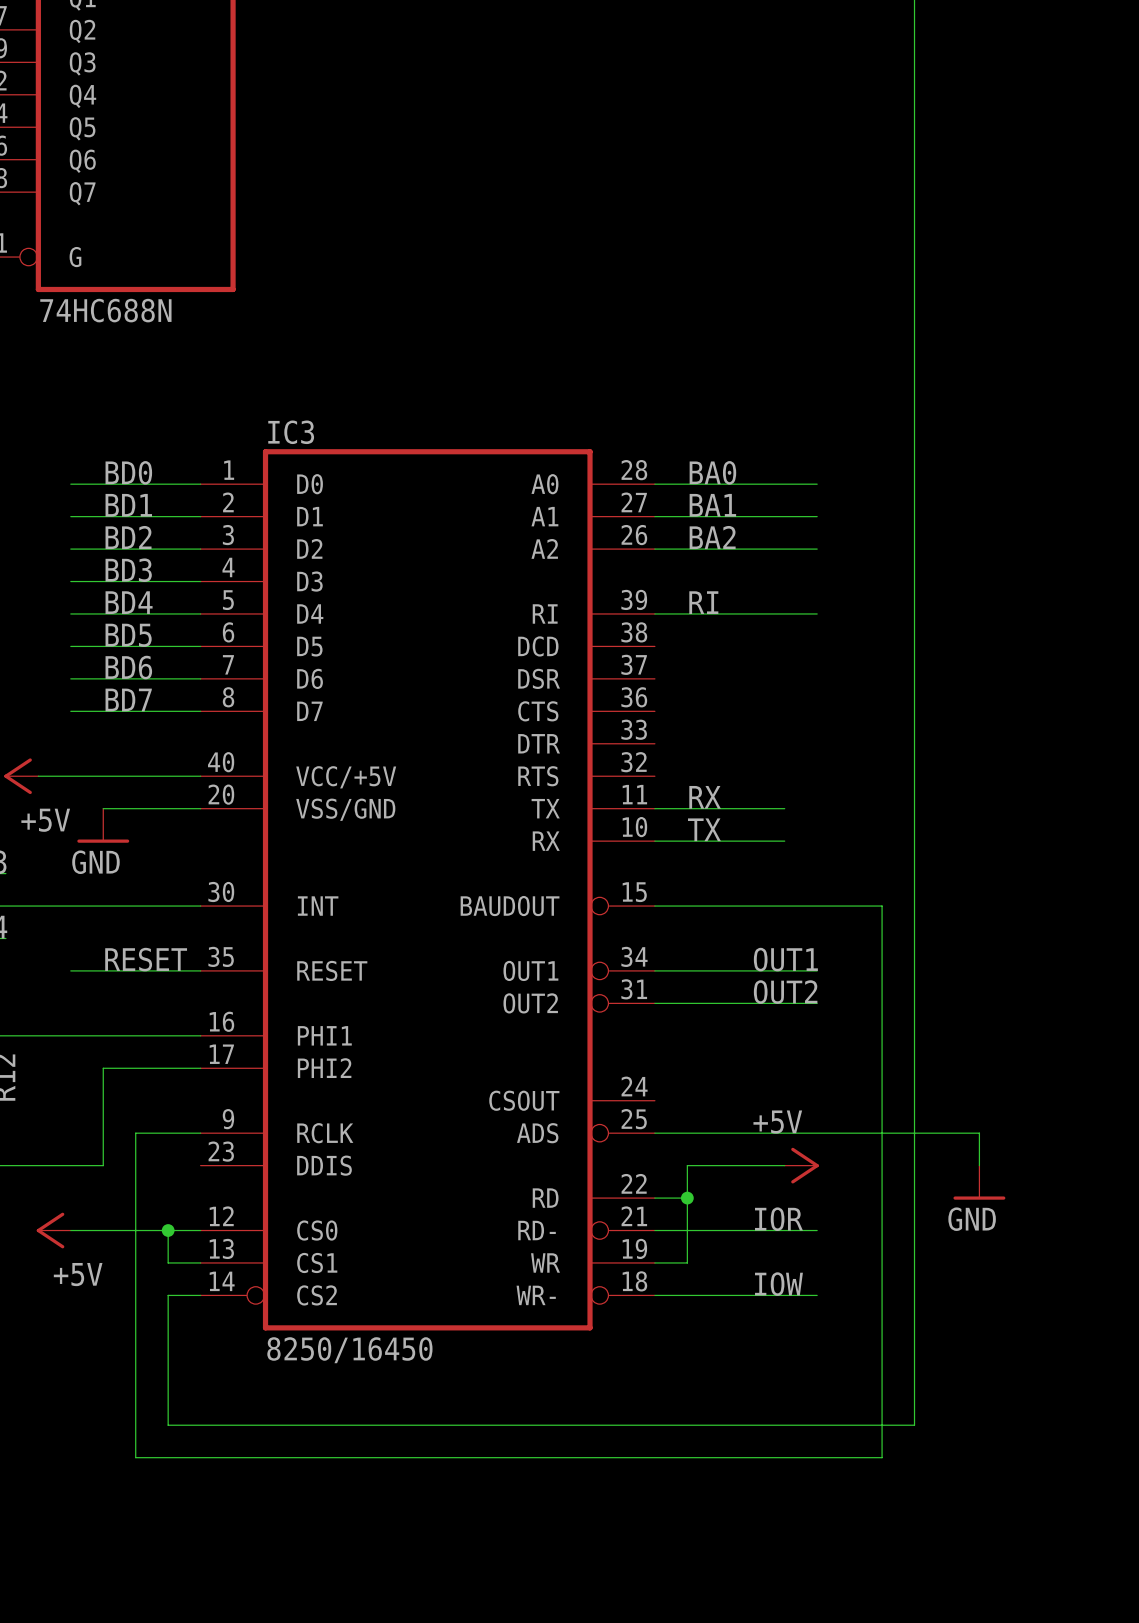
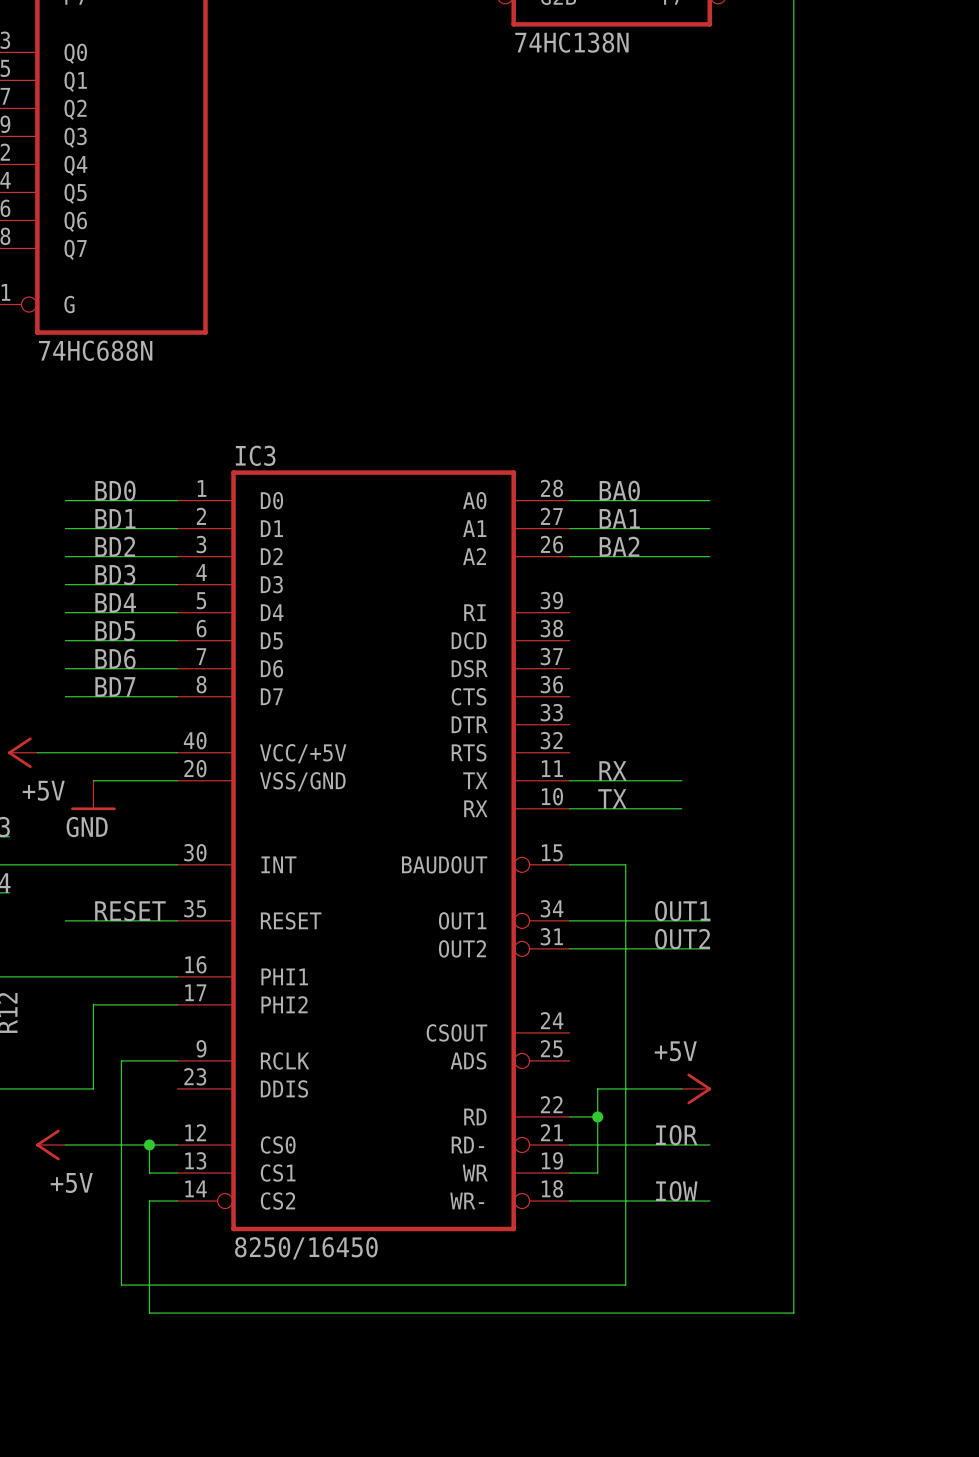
label: RI (703, 602) -> none
wire: (654, 613) (817, 613) -> none
wire: (719, 906) (882, 906) (882, 1457) (135, 1457) (135, 1392) -> (625, 864) (625, 1285) (121, 1285)
wire: (654, 1133) (979, 1133) (979, 1165) -> none
power symbol: GND (979, 1182) -> none

